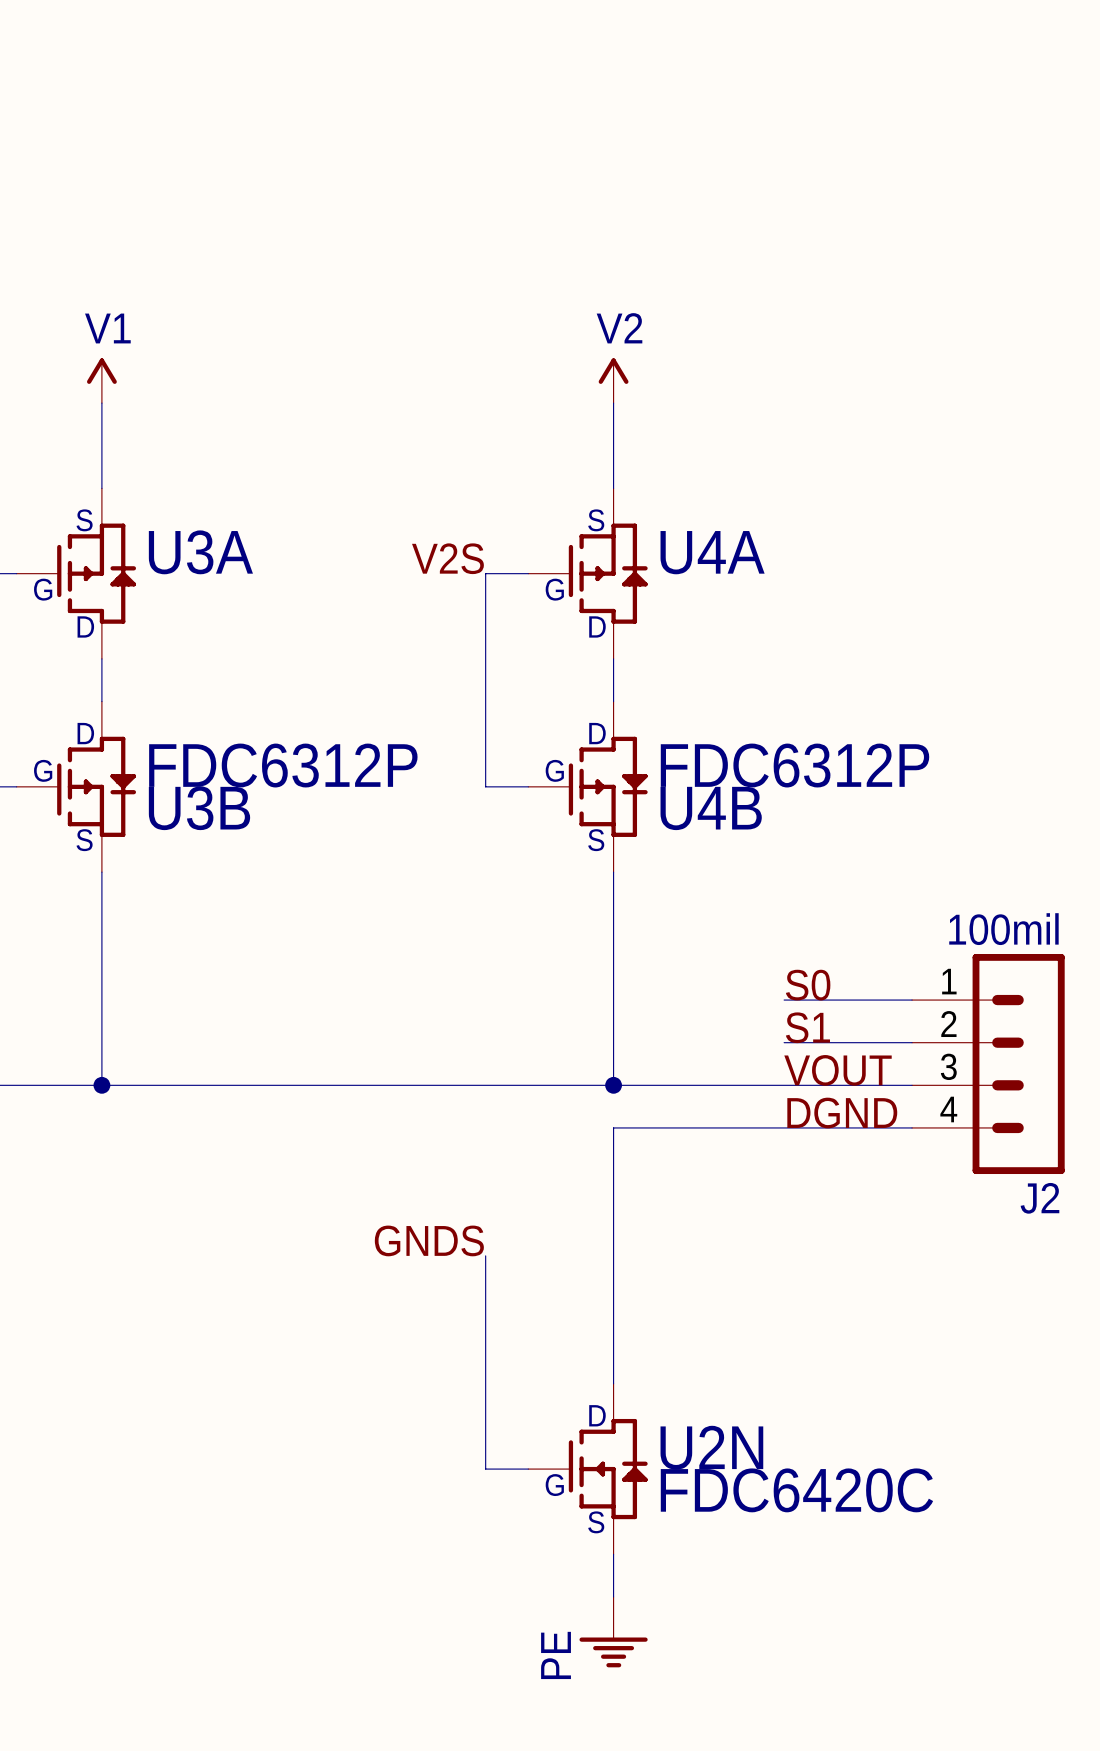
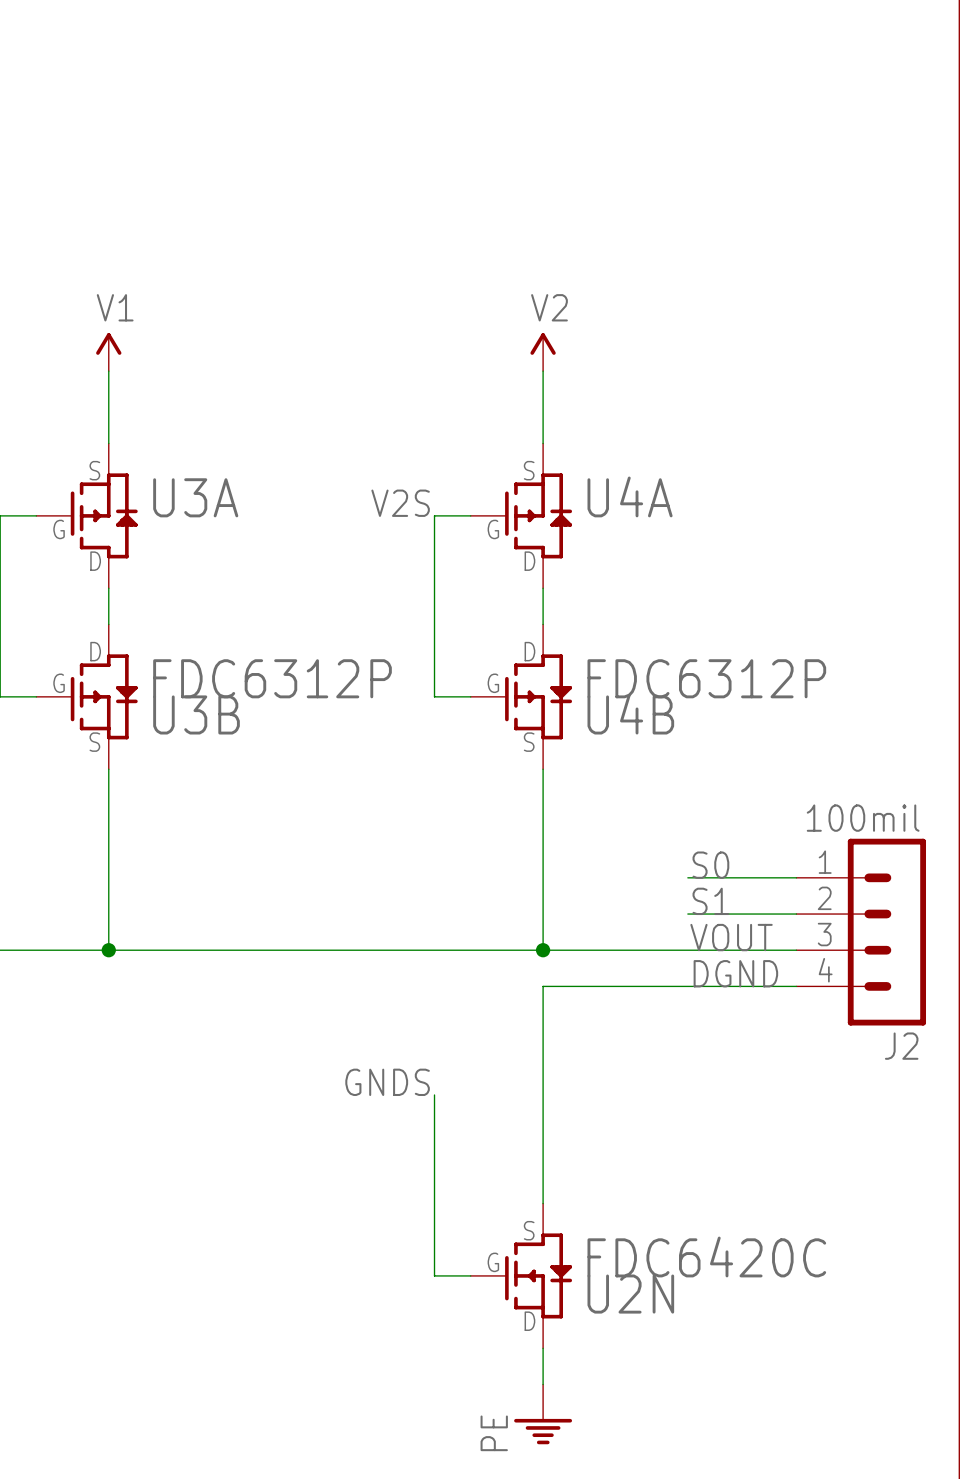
U2N symbol: [528, 1383, 648, 1555] -> [470, 1203, 573, 1349]
U2N name position: U2N (711, 1447) -> U2N (630, 1294)
U2N value position: FDC6420C (796, 1490) -> FDC6420C (706, 1256)

